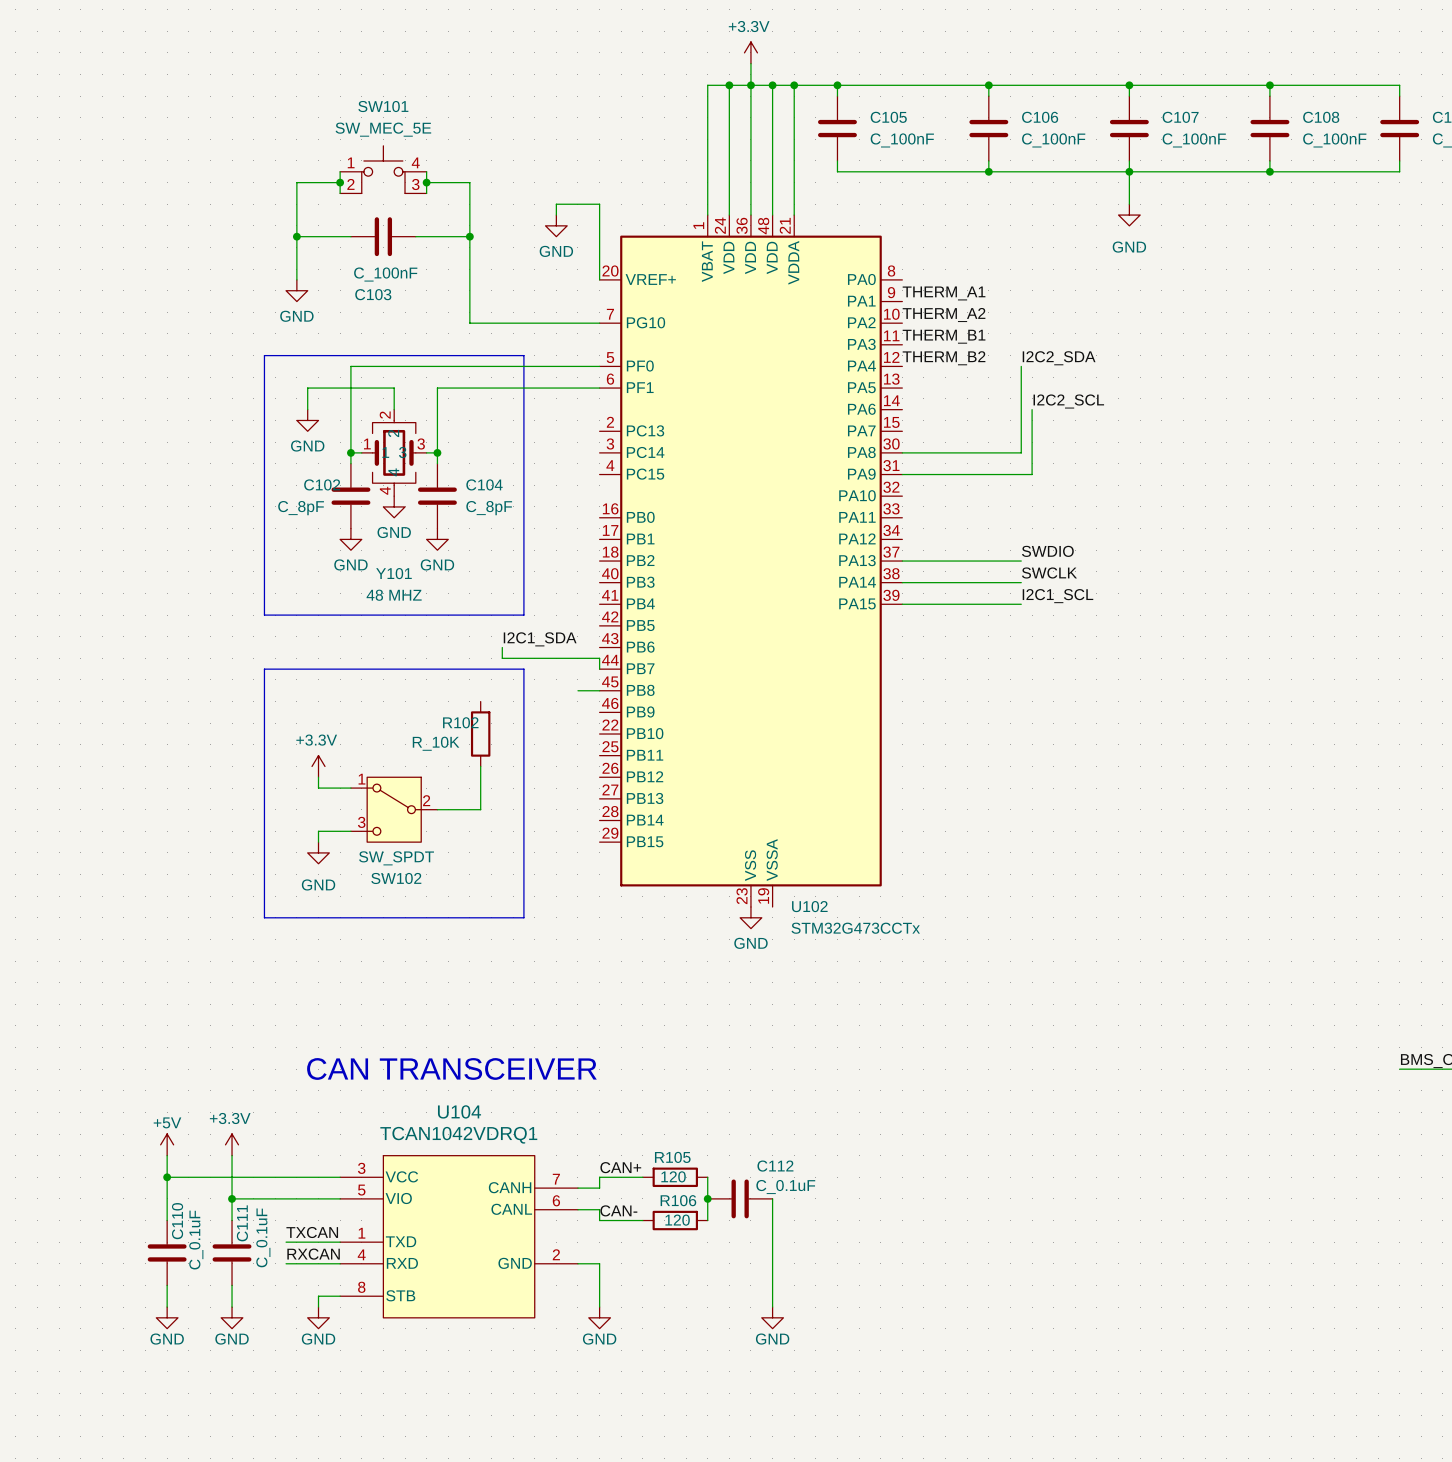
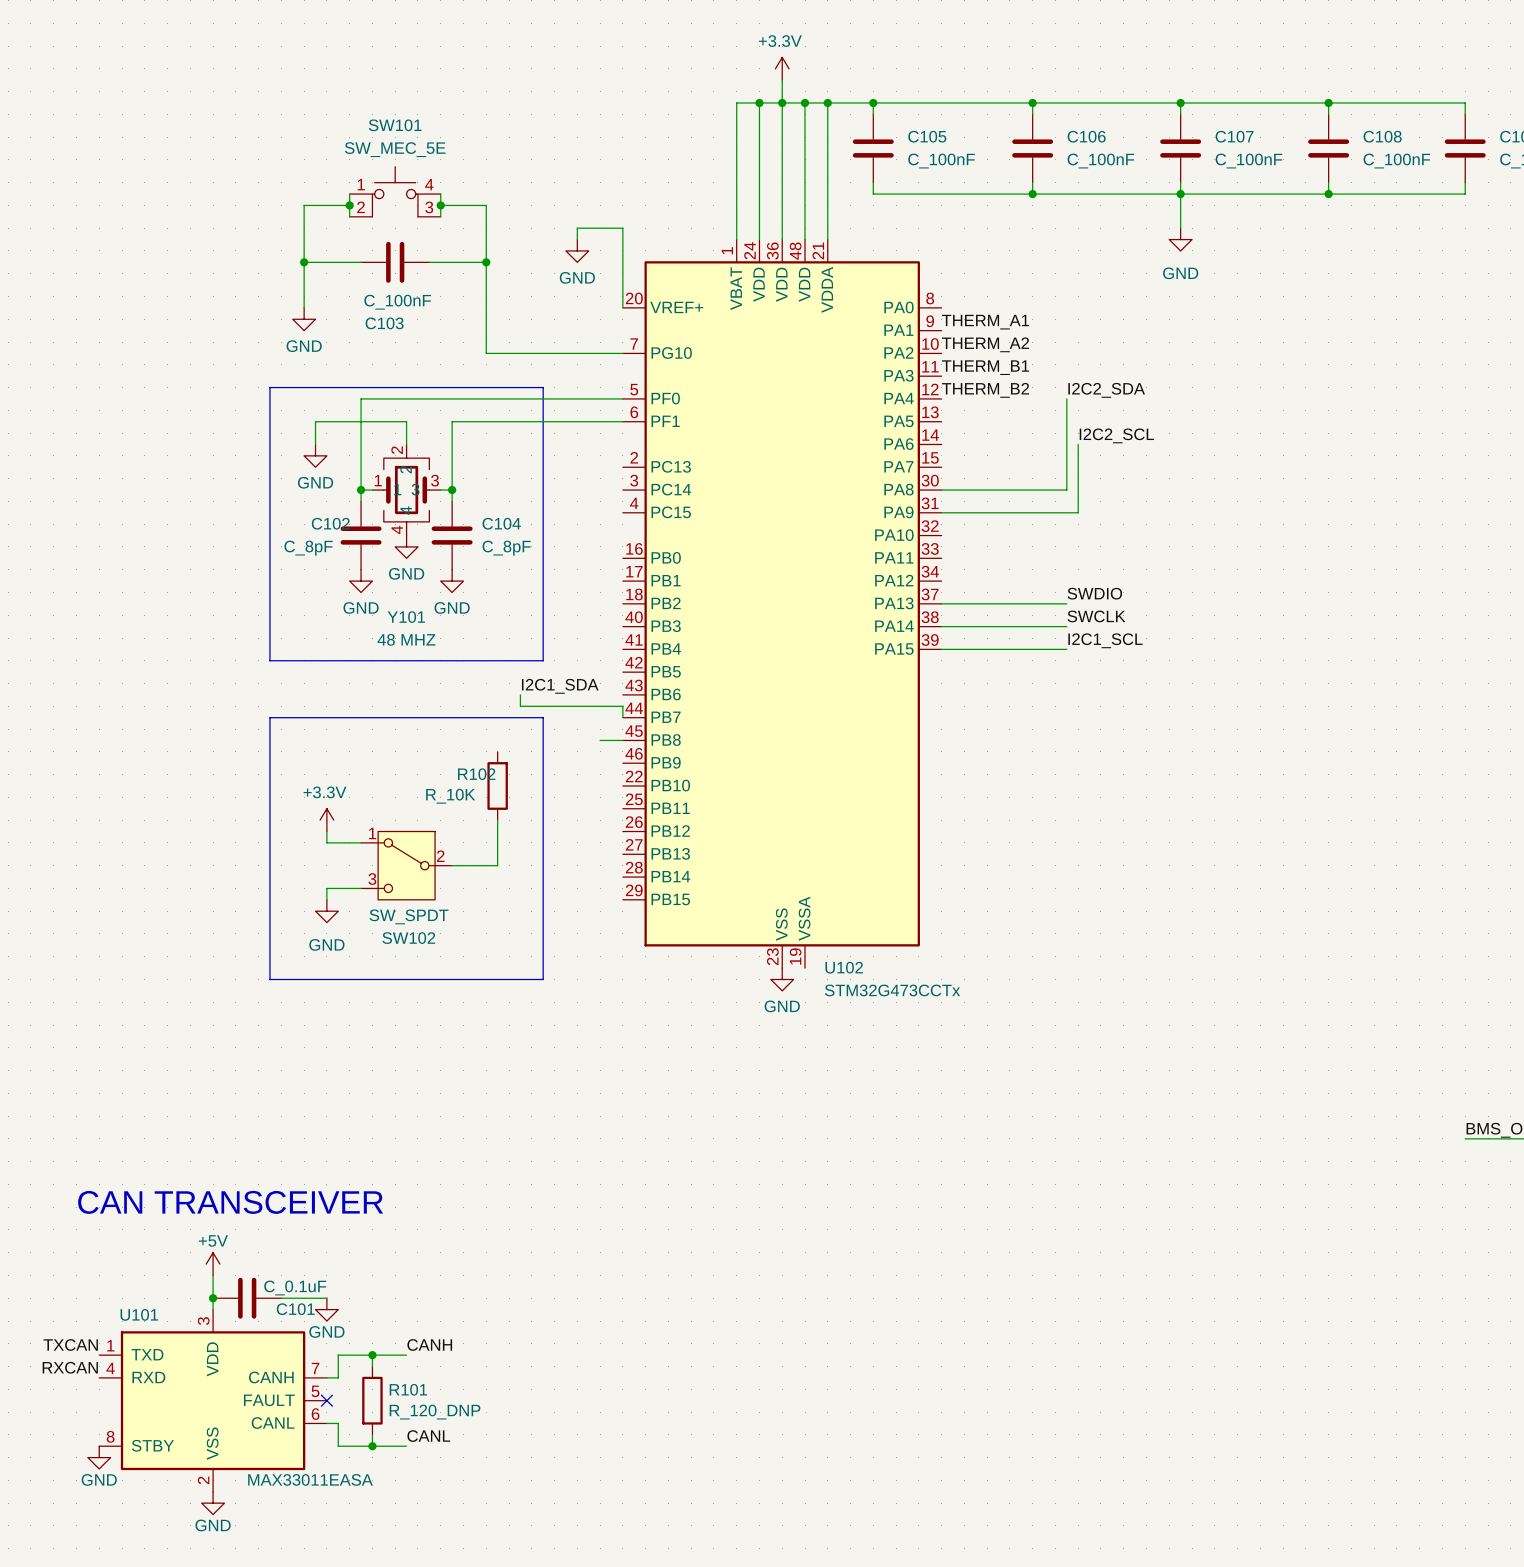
text: CAN TRANSCEIVER (451, 1068) -> none
text: none -> CAN TRANSCEIVER (230, 1202)
power symbol position: +5V (167, 1144) -> +5V (213, 1264)
power symbol: +3.3V (232, 1144) -> none
wire: (167, 1155) (167, 1220) -> none
wire: (232, 1155) (232, 1220) -> none
label: CAN+ (620, 1167) -> none
wire: (167, 1177) (340, 1177) -> none
junction: (167, 1177) -> none
wire: (642, 1177) (599, 1177) (599, 1188) (577, 1188) -> none
R105: 120 (675, 1177) -> none
wire: (707, 1177) (707, 1220) -> none
wire: none -> (213, 1275) (213, 1309)
wire: (232, 1198) (340, 1198) -> none
junction: (232, 1198) -> none
junction: (707, 1198) -> none
C112: C_0.1uF (740, 1198) -> none
wire: (772, 1198) (772, 1307) -> none
wire: (577, 1209) (599, 1209) (599, 1220) (642, 1220) -> none
label: CAN- (618, 1210) -> none
junction: none -> (213, 1298)
C101: none -> C_0.1uF (247, 1298)
wire: none -> (281, 1298) (326, 1298)
R106: 120 (675, 1220) -> none
power symbol: none -> GND (326, 1309)
label position: TXCAN (312, 1232) -> TXCAN (70, 1344)
U104: TCAN1042VDRQ1 (459, 1236) -> none
wire: (286, 1242) (340, 1242) -> none
C110: C_0.1uF (167, 1252) -> none
C111: C_0.1uF (232, 1252) -> none
label position: RXCAN (313, 1254) -> RXCAN (70, 1367)
wire: (286, 1263) (340, 1263) -> none
wire: (577, 1263) (599, 1263) (599, 1307) -> none
label: none -> CANH (429, 1344)
junction: none -> (372, 1355)
wire: (318, 1296) (318, 1307) -> (372, 1355) (372, 1366)
wire: (329, 1296) (340, 1296) -> (338, 1377) (338, 1355) (406, 1355)
power symbol: GND (167, 1317) -> none
U101: none -> MAX33011EASA (213, 1400)
power symbol: GND (232, 1317) -> none
power symbol: GND (318, 1317) -> none
no-connect mark: none -> (326, 1400)
R101: none -> R_120_DNP (372, 1400)
power symbol: GND (599, 1317) -> none
power symbol: GND (772, 1317) -> none
wire: none -> (326, 1423) (338, 1423) (338, 1446) (406, 1446)
wire: none -> (372, 1434) (372, 1446)
label: none -> CANL (428, 1436)
junction: none -> (372, 1446)
power symbol: none -> GND (99, 1457)
power symbol: none -> GND (213, 1503)

